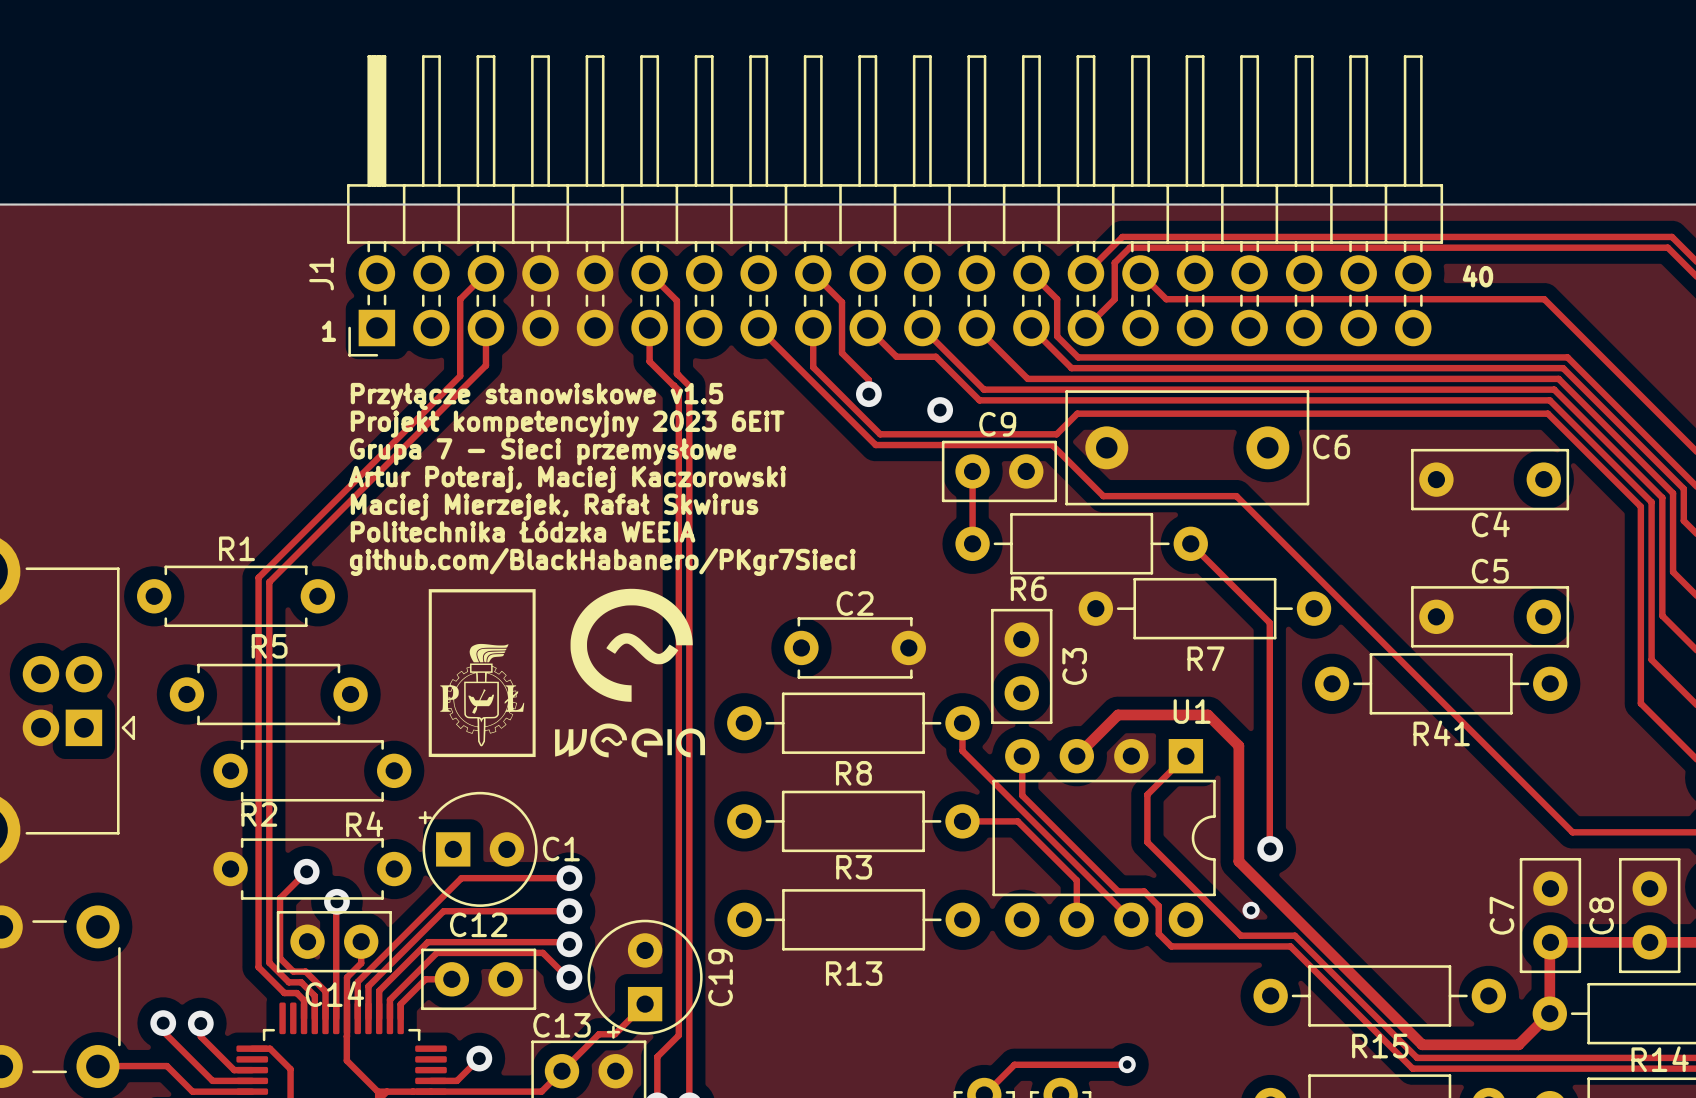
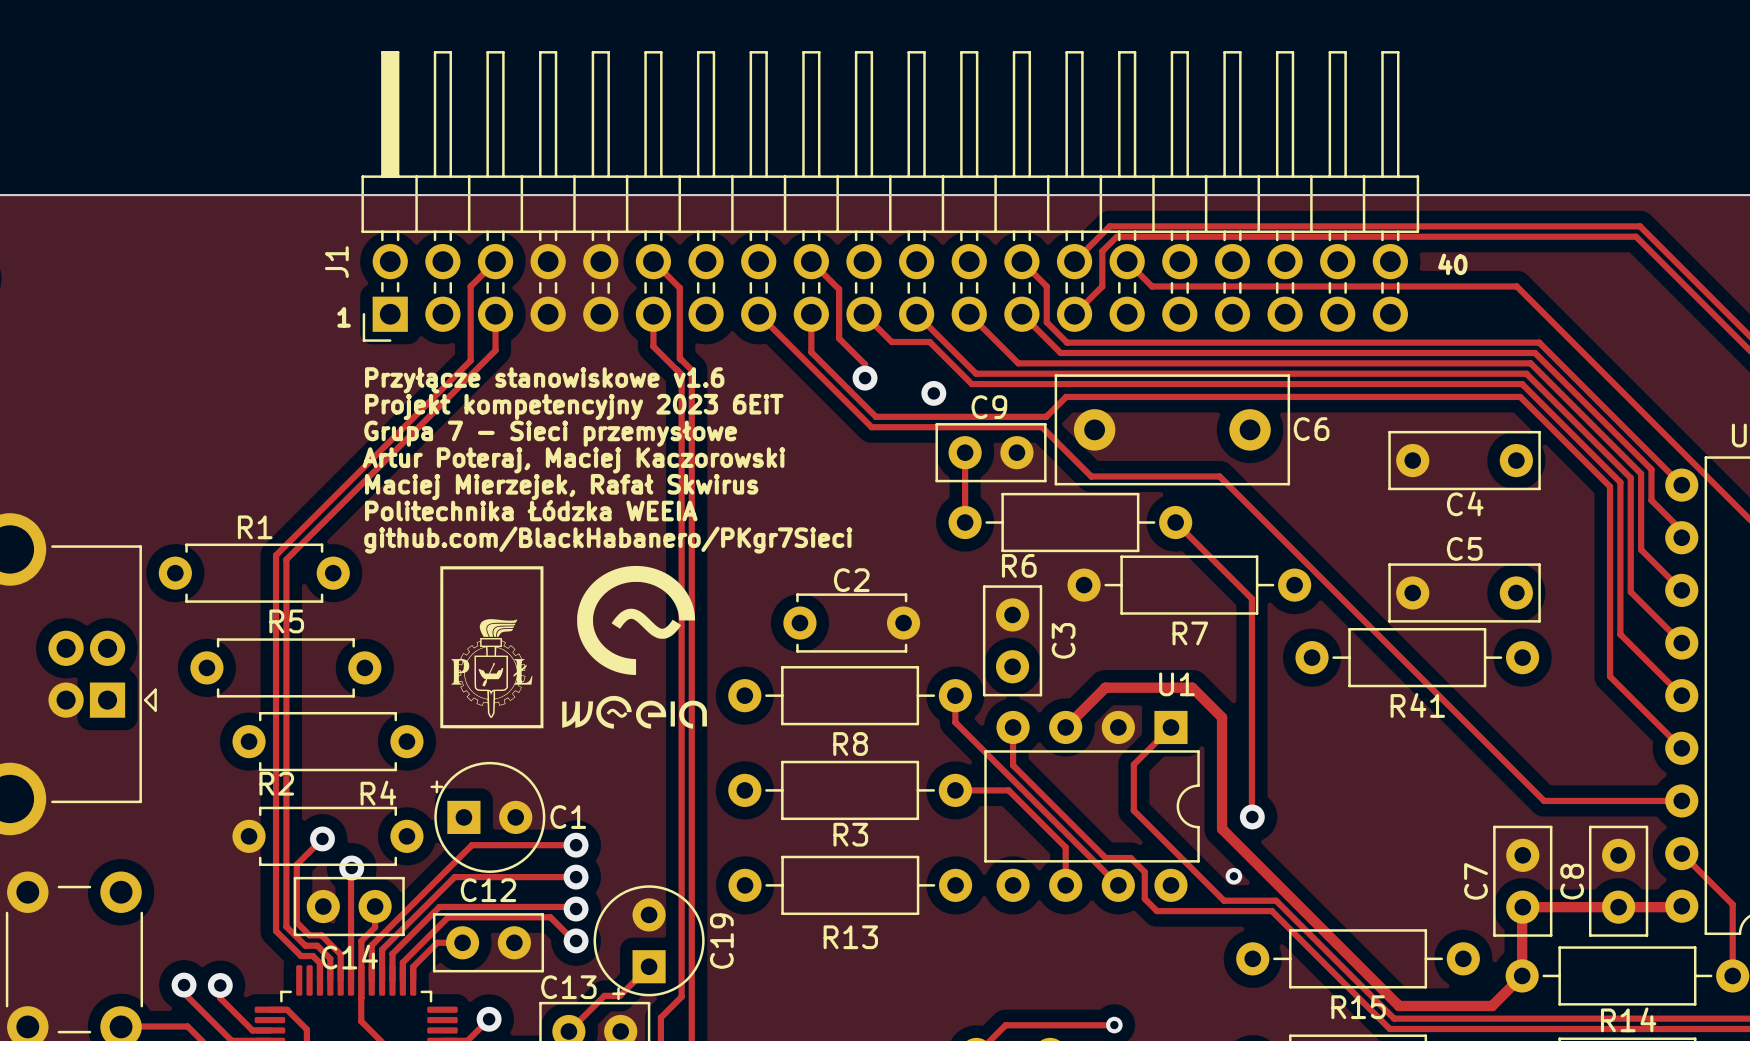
text: Przyłącze stanowiskowe v1.5 (536, 396) -> Przyłącze stanowiskowe v1.6 (544, 380)

